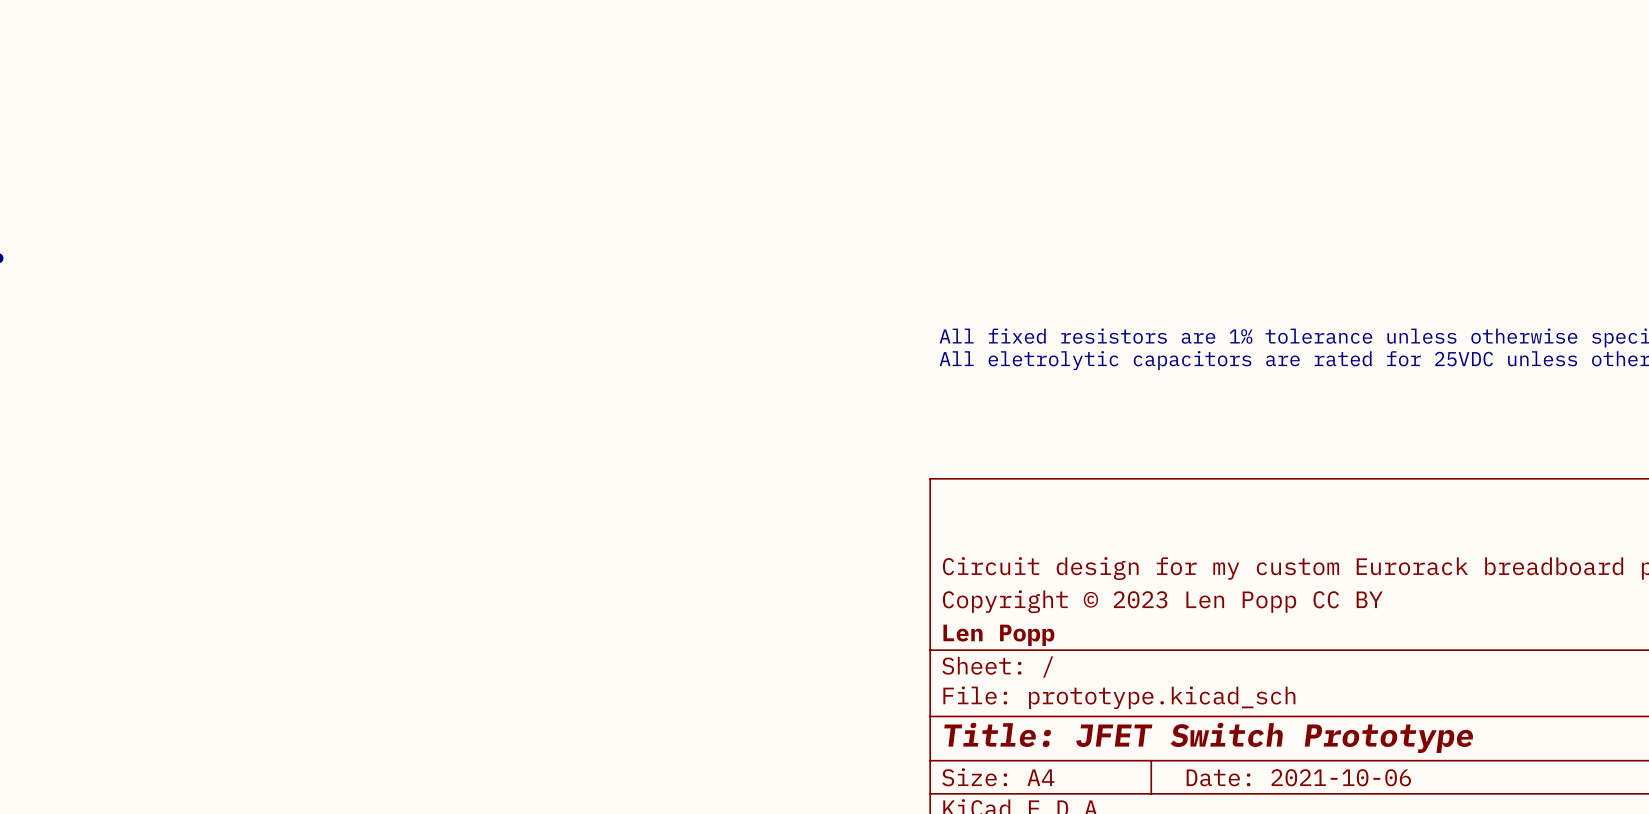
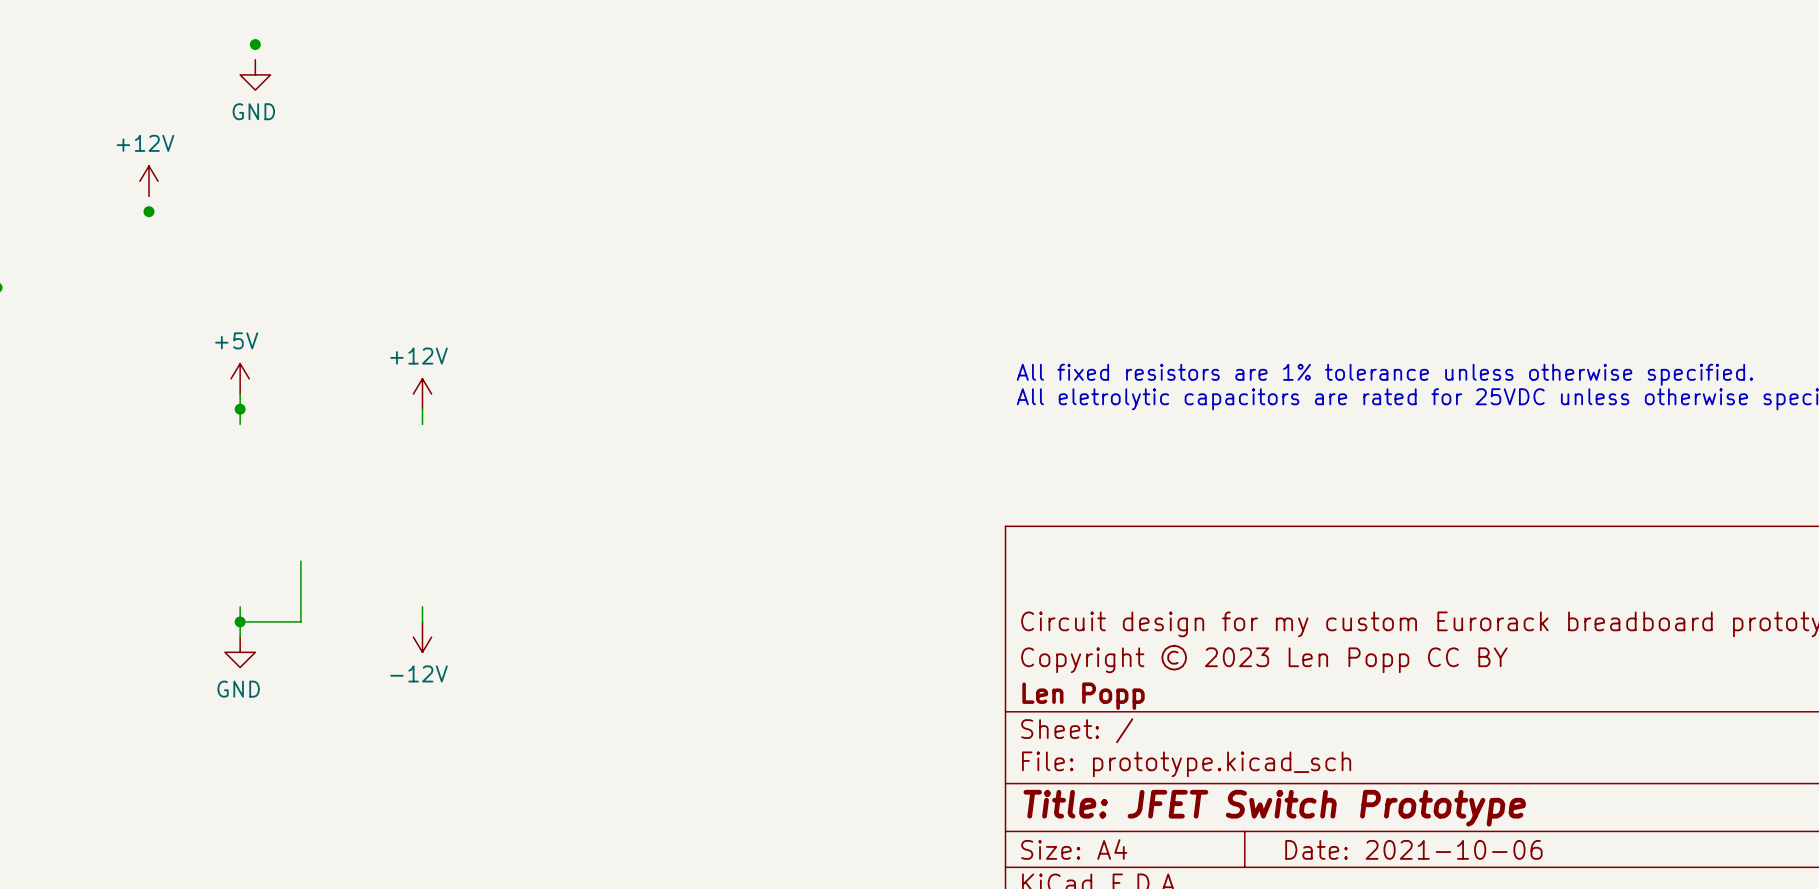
junction: none -> (255, 44)
power symbol: none -> GND (255, 74)
power symbol: none -> +12V (148, 181)
junction: none -> (148, 211)
power symbol: none -> +5V (240, 378)
wire: none -> (240, 394) (240, 424)
power symbol: none -> +12V (422, 394)
junction: none -> (240, 409)
wire: none -> (422, 409) (422, 424)
wire: none -> (300, 561) (300, 621) (240, 621)
wire: none -> (240, 606) (240, 637)
wire: none -> (422, 606) (422, 621)
junction: none -> (240, 621)
power symbol: none -> -12V (422, 637)
power symbol: none -> GND (240, 652)

